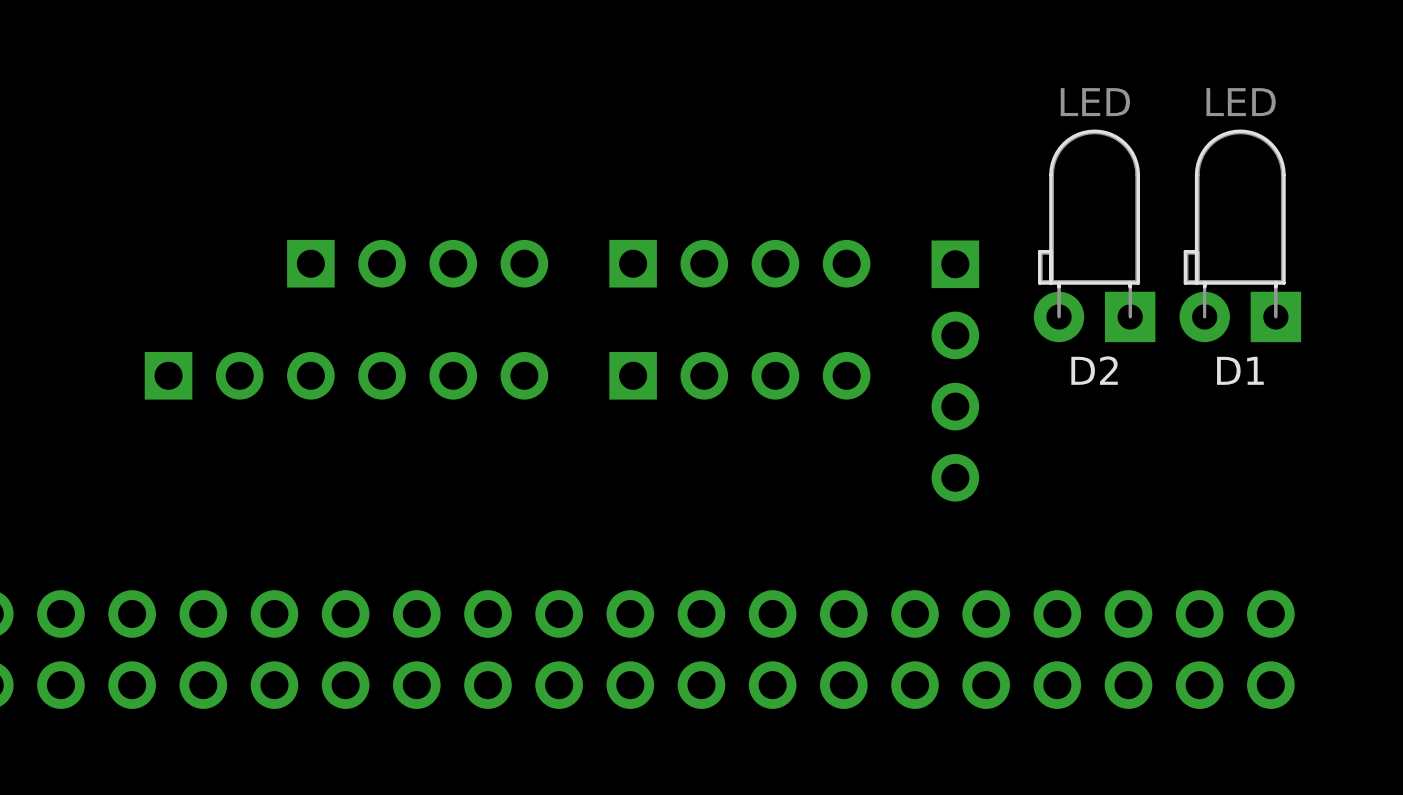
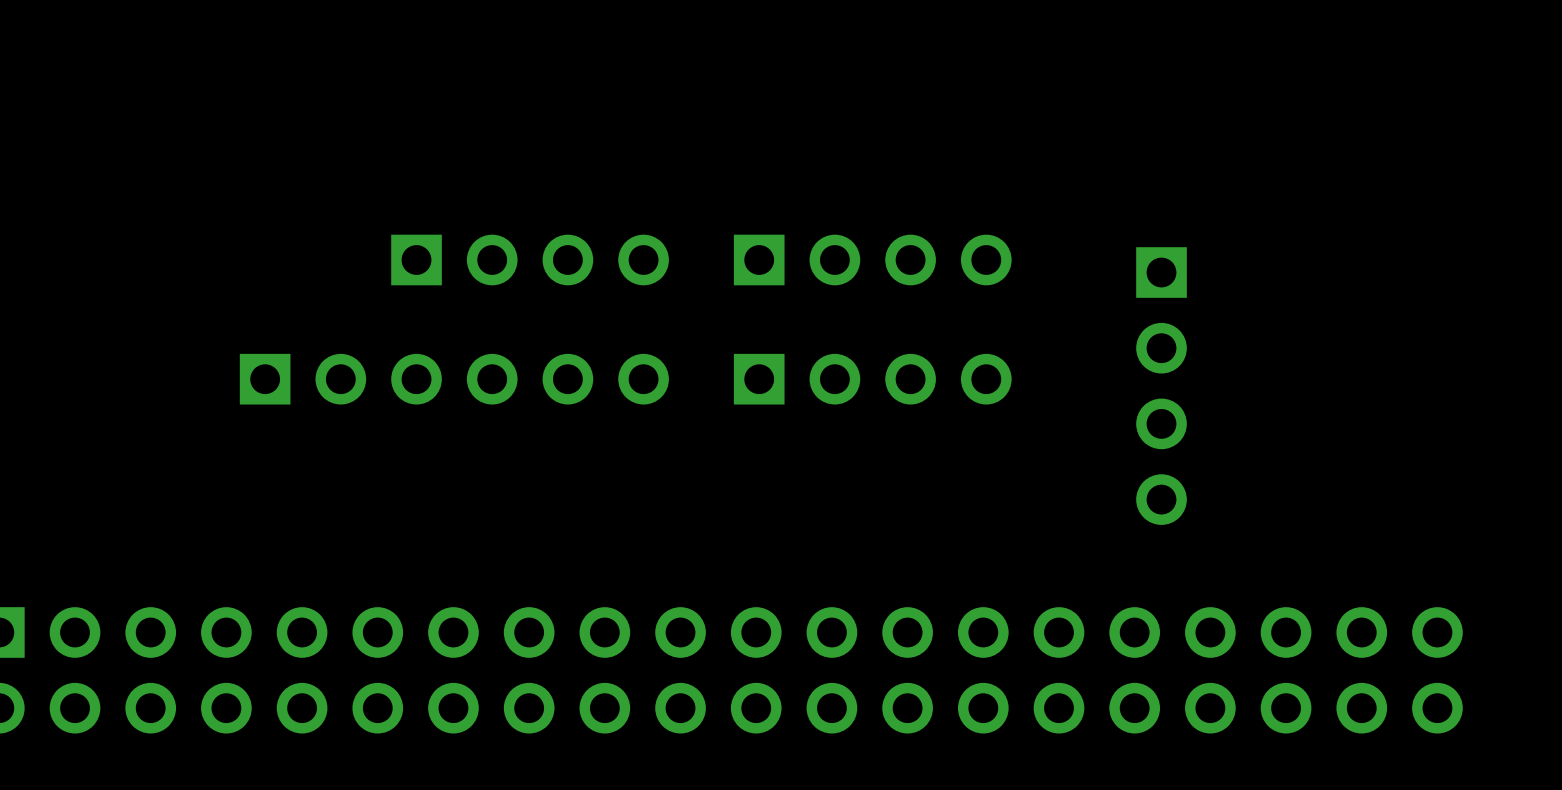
D2: LED (1094, 235) -> none
D1: LED (1240, 235) -> none
part position: (955, 371) -> (1161, 386)

